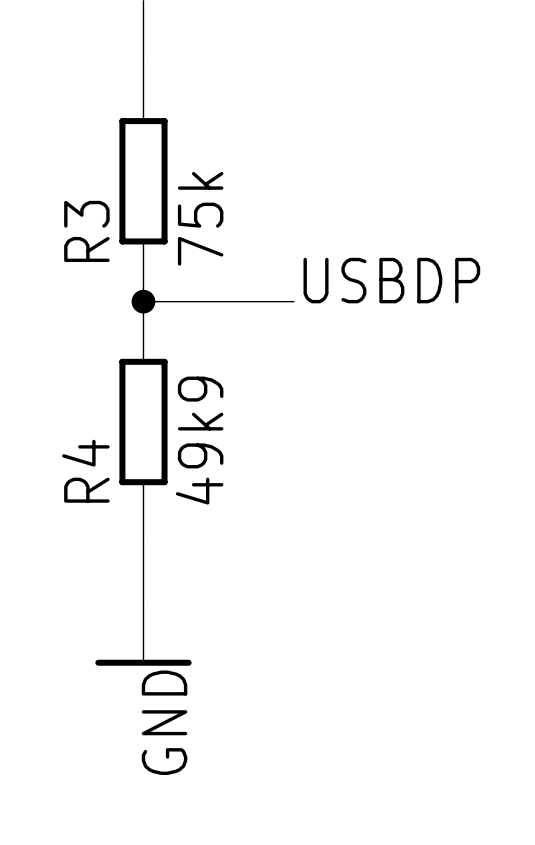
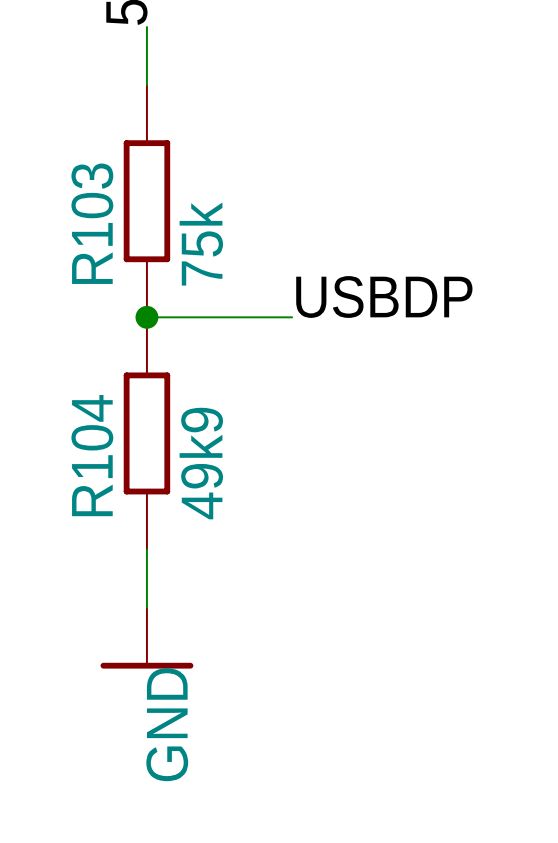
R3 name: R3 (86, 231) -> R103 (92, 223)
R4 name: R4 (85, 471) -> R104 (92, 455)

